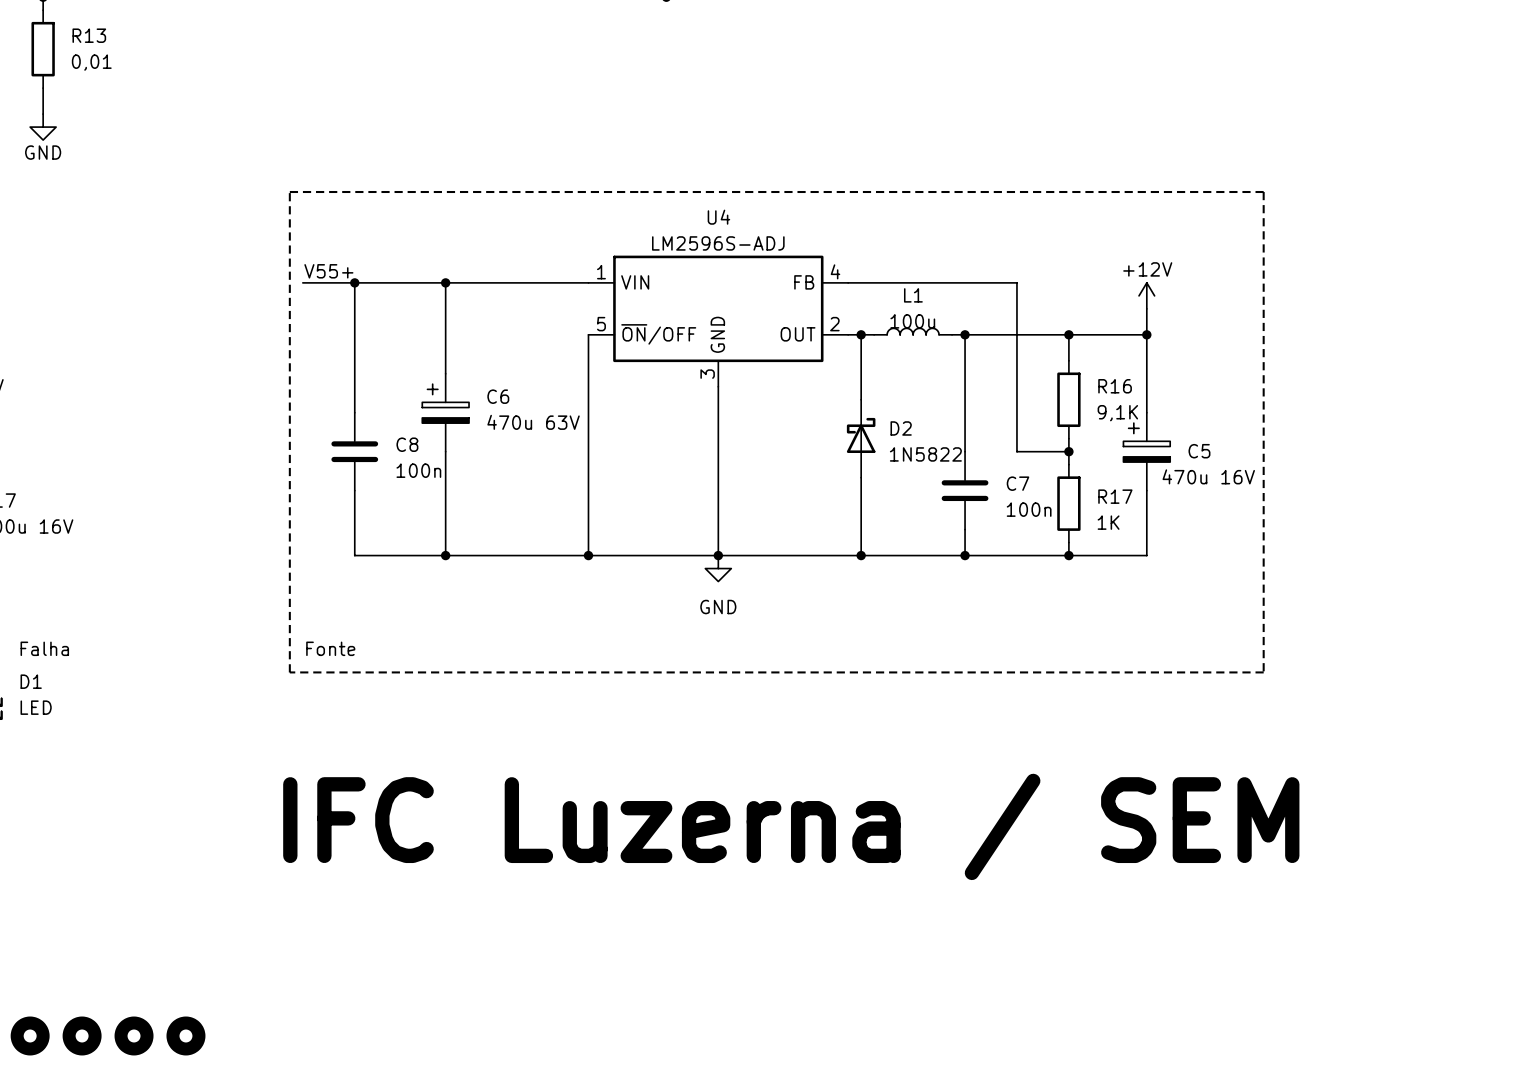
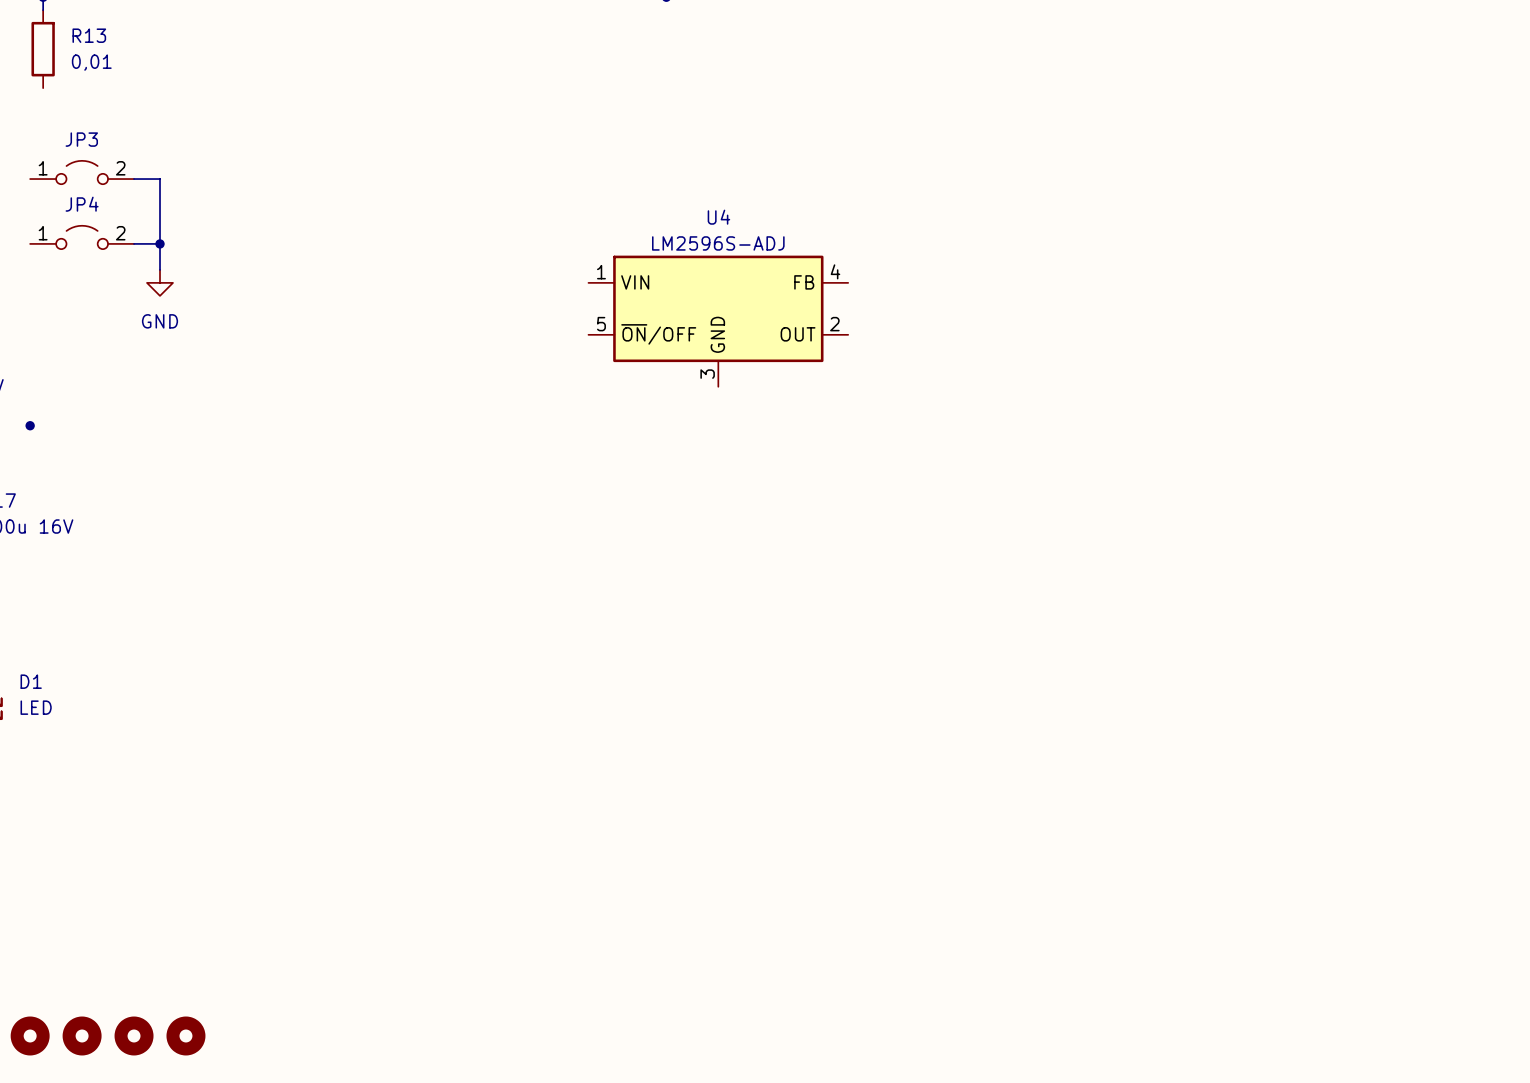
wire: (43, 88) (43, 114) -> none
power symbol: GND (43, 127) -> none
JP3: none -> (82, 172)
wire: none -> (134, 179) (160, 179) (160, 269)
line: (289, 192) (1263, 192) (1263, 672) (289, 672) (289, 192) -> none
JP4: none -> (82, 237)
wire: none -> (134, 243) (160, 243)
junction: none -> (160, 243)
label: V55+ (328, 271) -> none
power symbol: none -> GND (160, 282)
wire: (302, 282) (588, 282) -> none
wire: (354, 282) (354, 412) -> none
junction: (354, 282) -> none
wire: (445, 282) (445, 373) -> none
junction: (445, 282) -> none
wire: (848, 282) (1016, 282) (1016, 451) (1068, 451) -> none
power symbol: +12V (1146, 295) -> none
wire: (1146, 308) (1146, 412) -> none
L1: 100u (913, 331) -> none
wire: (588, 334) (588, 555) -> none
wire: (848, 334) (874, 334) -> none
wire: (861, 334) (861, 399) -> none
junction: (861, 334) -> none
wire: (952, 334) (1146, 334) -> none
wire: (965, 334) (965, 451) -> none
junction: (965, 334) -> none
wire: (1068, 334) (1068, 360) -> none
junction: (1068, 334) -> none
junction: (1146, 334) -> none
wire: (718, 386) (718, 555) -> none
R16: 9,1K (1068, 399) -> none
C6: 470u 63V (445, 412) -> none
junction: none -> (30, 425)
D2: 1N5822 (861, 438) -> none
wire: (1068, 438) (1068, 464) -> none
C8: 100n (354, 451) -> none
wire: (445, 451) (445, 555) -> none
junction: (1068, 451) -> none
C5: 470u 16V (1146, 451) -> none
wire: (861, 477) (861, 555) -> none
wire: (354, 490) (354, 555) (1146, 555) (1146, 490) -> none
C7: 100n (965, 490) -> none
R17: 1K (1068, 503) -> none
wire: (965, 529) (965, 555) -> none
wire: (1068, 542) (1068, 555) -> none
junction: (445, 555) -> none
junction: (588, 555) -> none
junction: (718, 555) -> none
junction: (861, 555) -> none
junction: (965, 555) -> none
junction: (1068, 555) -> none
power symbol: GND (718, 568) -> none
text: Falha (44, 648) -> none
text: Fonte (330, 648) -> none
text: IFC Luzerna / SEM (791, 826) -> none

